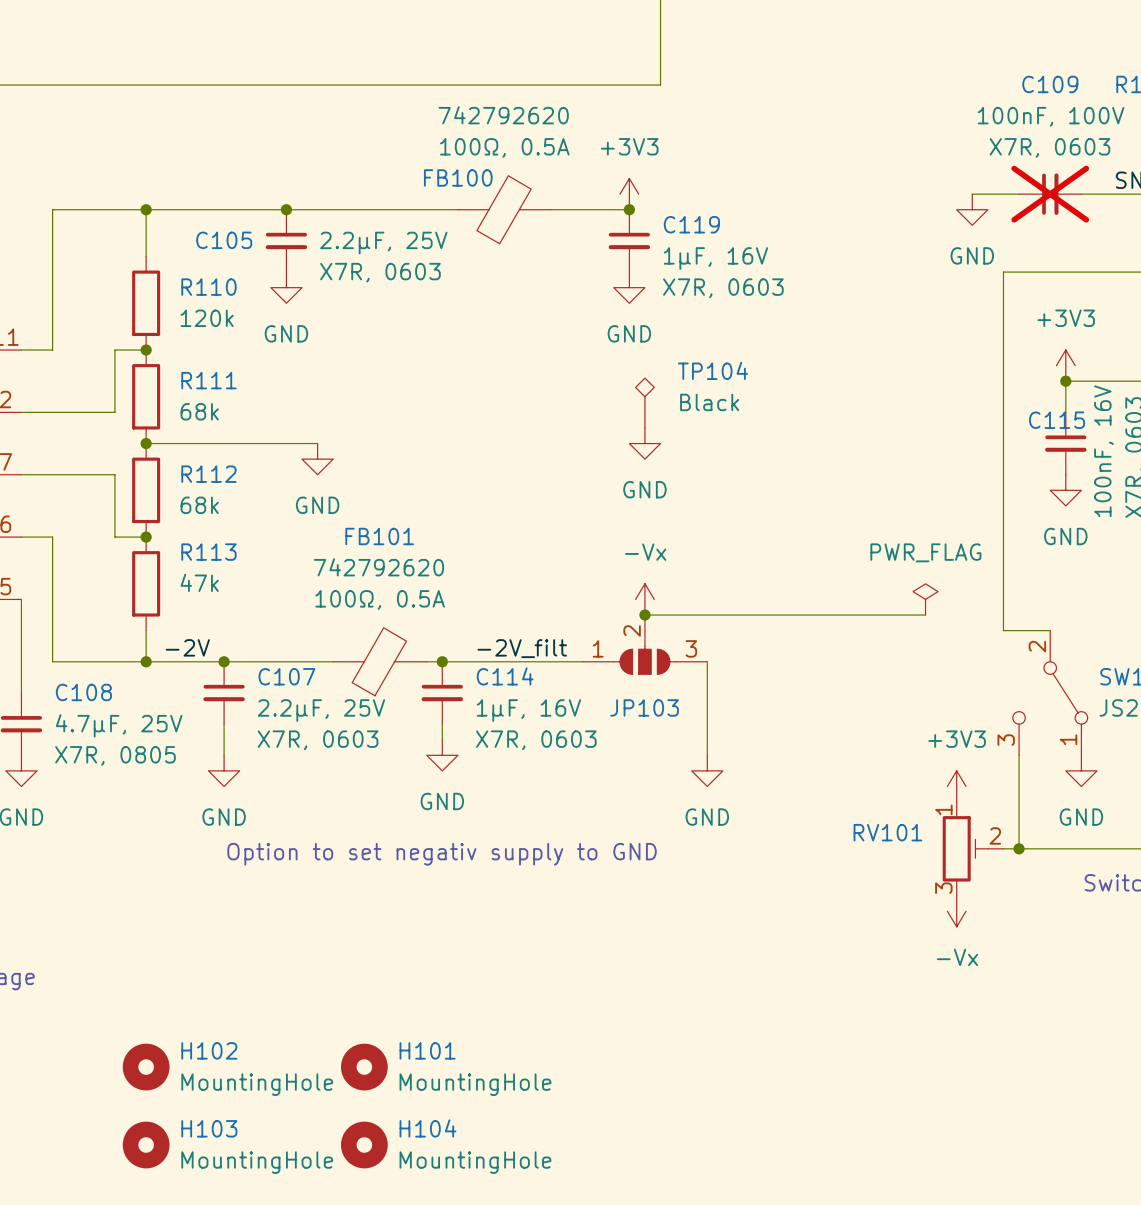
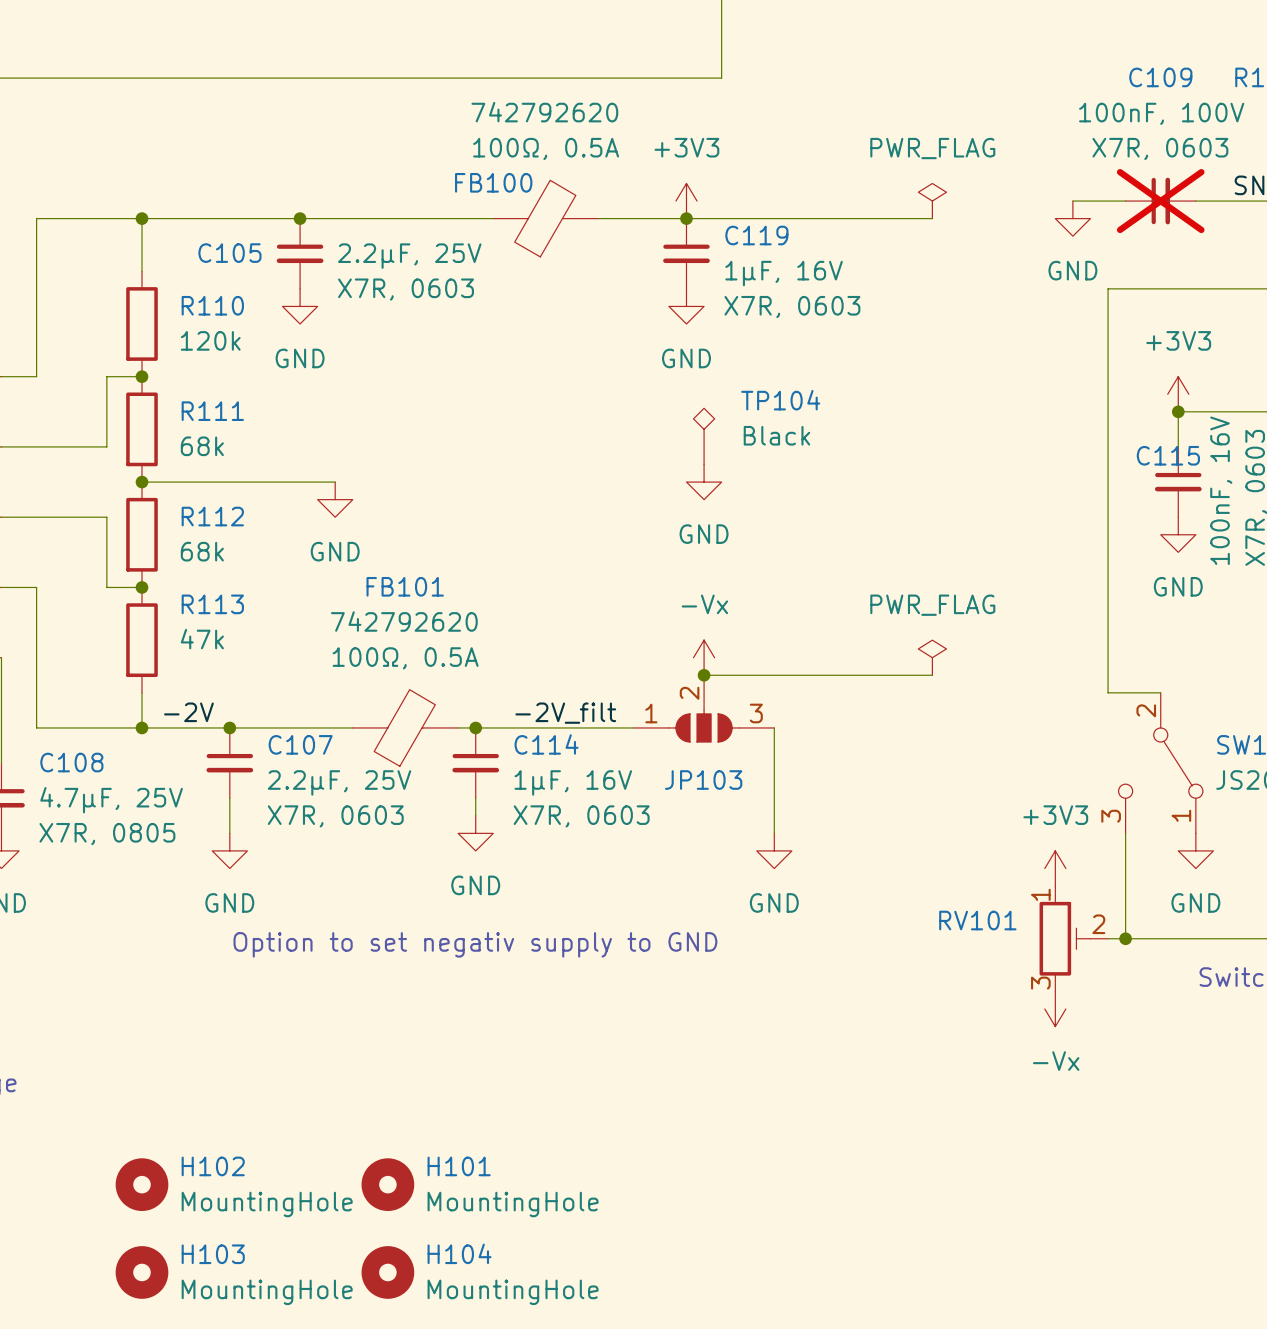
power symbol: none -> PWR_FLAG (932, 201)
wire: none -> (686, 218) (932, 218)
power symbol position: PWR_FLAG (925, 599) -> PWR_FLAG (932, 657)
wire: (847, 615) (925, 615) -> none

